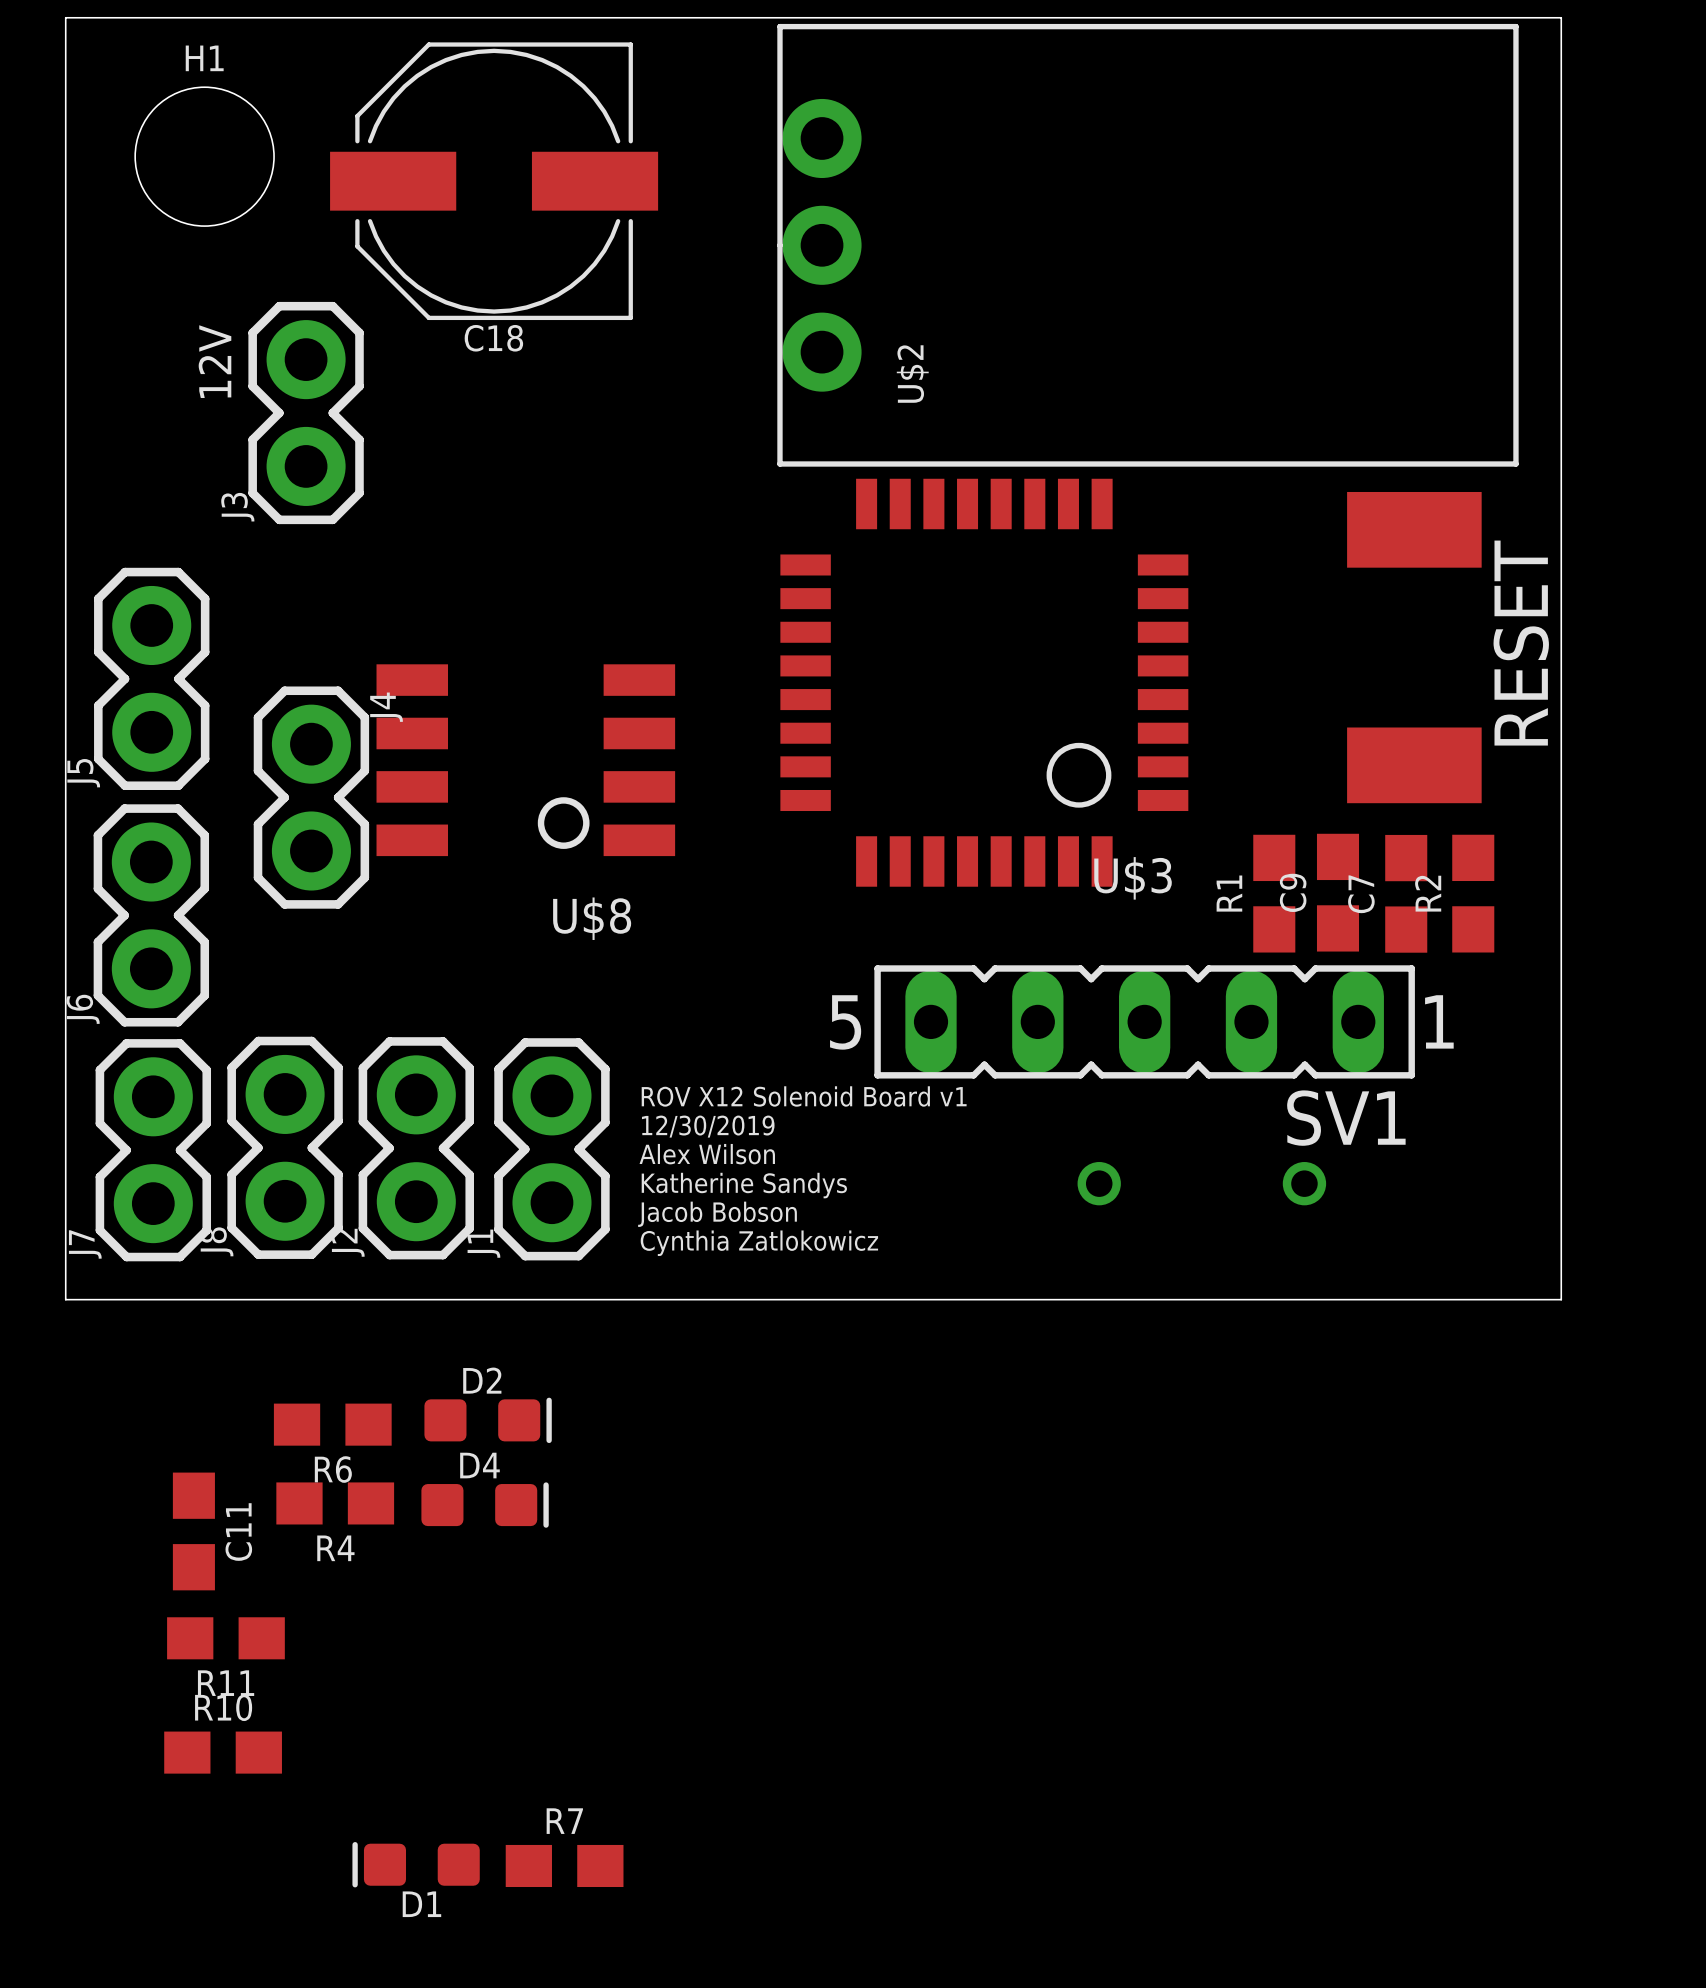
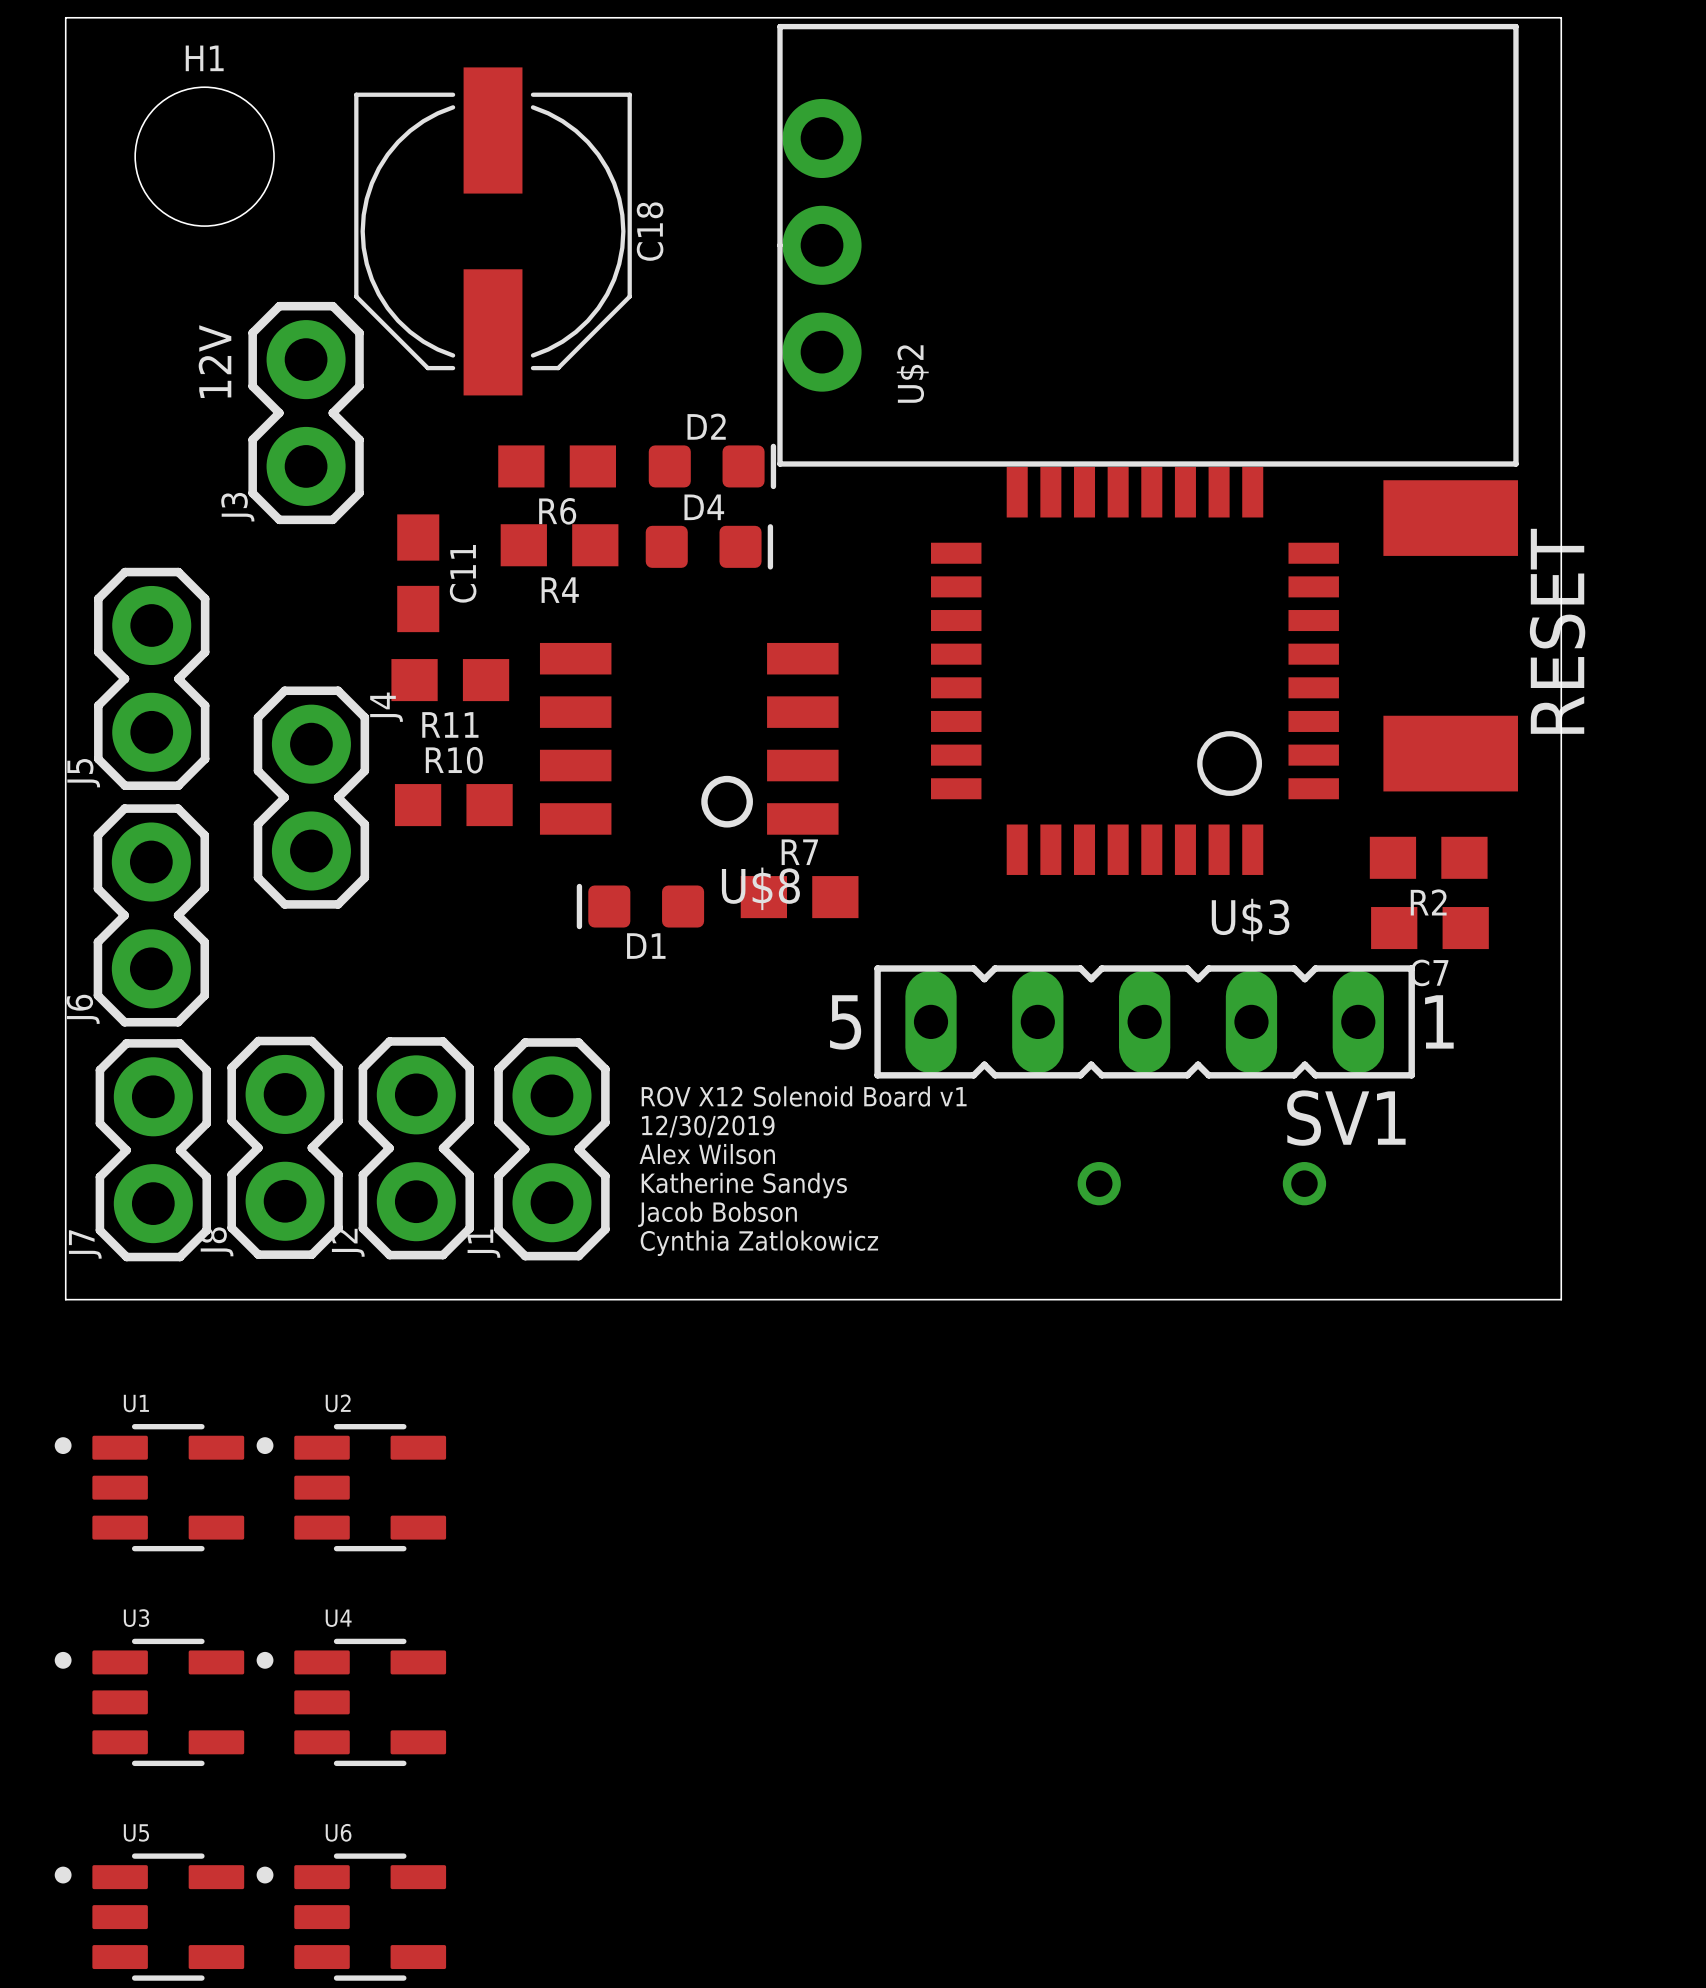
C18 rotation: 0° (494, 181) -> 90° counterclockwise (493, 231)
RESET position: (1414, 647) -> (1450, 635)
U$3 position: (984, 682) -> (1134, 670)
U$8 position: (525, 760) -> (689, 738)
U$3 name position: U$3 (1133, 878) -> U$3 (1250, 920)
C9: (1338, 892) -> none
R1: (1274, 893) -> none
C7 rotation: 0° (1406, 893) -> 90° clockwise (1429, 928)
R2 rotation: 0° (1473, 893) -> 90° clockwise (1428, 857)
U$8 name position: U$8 (592, 918) -> U$8 (760, 888)
D2 position: (488, 1420) -> (712, 466)
R6 position: (332, 1424) -> (557, 466)
U1: none -> (149, 1487)
U2: none -> (351, 1487)
R4 position: (335, 1503) -> (559, 545)
D4 position: (485, 1505) -> (709, 546)
C11 position: (193, 1531) -> (418, 573)
R11 position: (225, 1638) -> (450, 680)
U3: none -> (149, 1702)
U4: none -> (351, 1702)
R10 position: (223, 1752) -> (453, 805)
D1 position: (416, 1864) -> (640, 906)
R7 position: (564, 1865) -> (799, 897)
U5: none -> (149, 1917)
U6: none -> (351, 1917)

